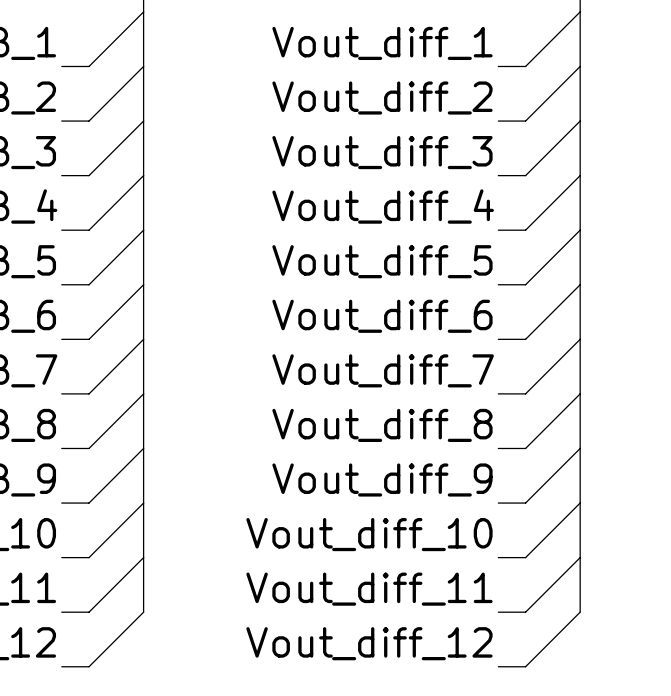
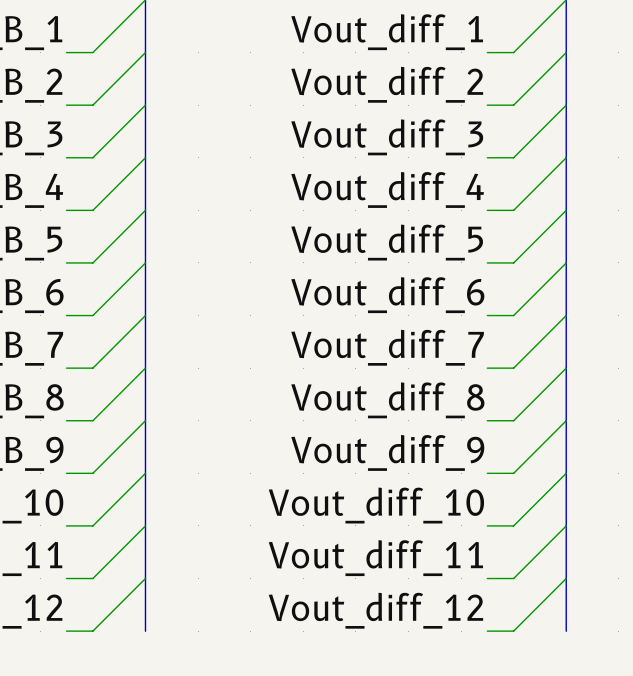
bus: none -> (145, 578) (145, 631)
bus: none -> (566, 578) (566, 631)

